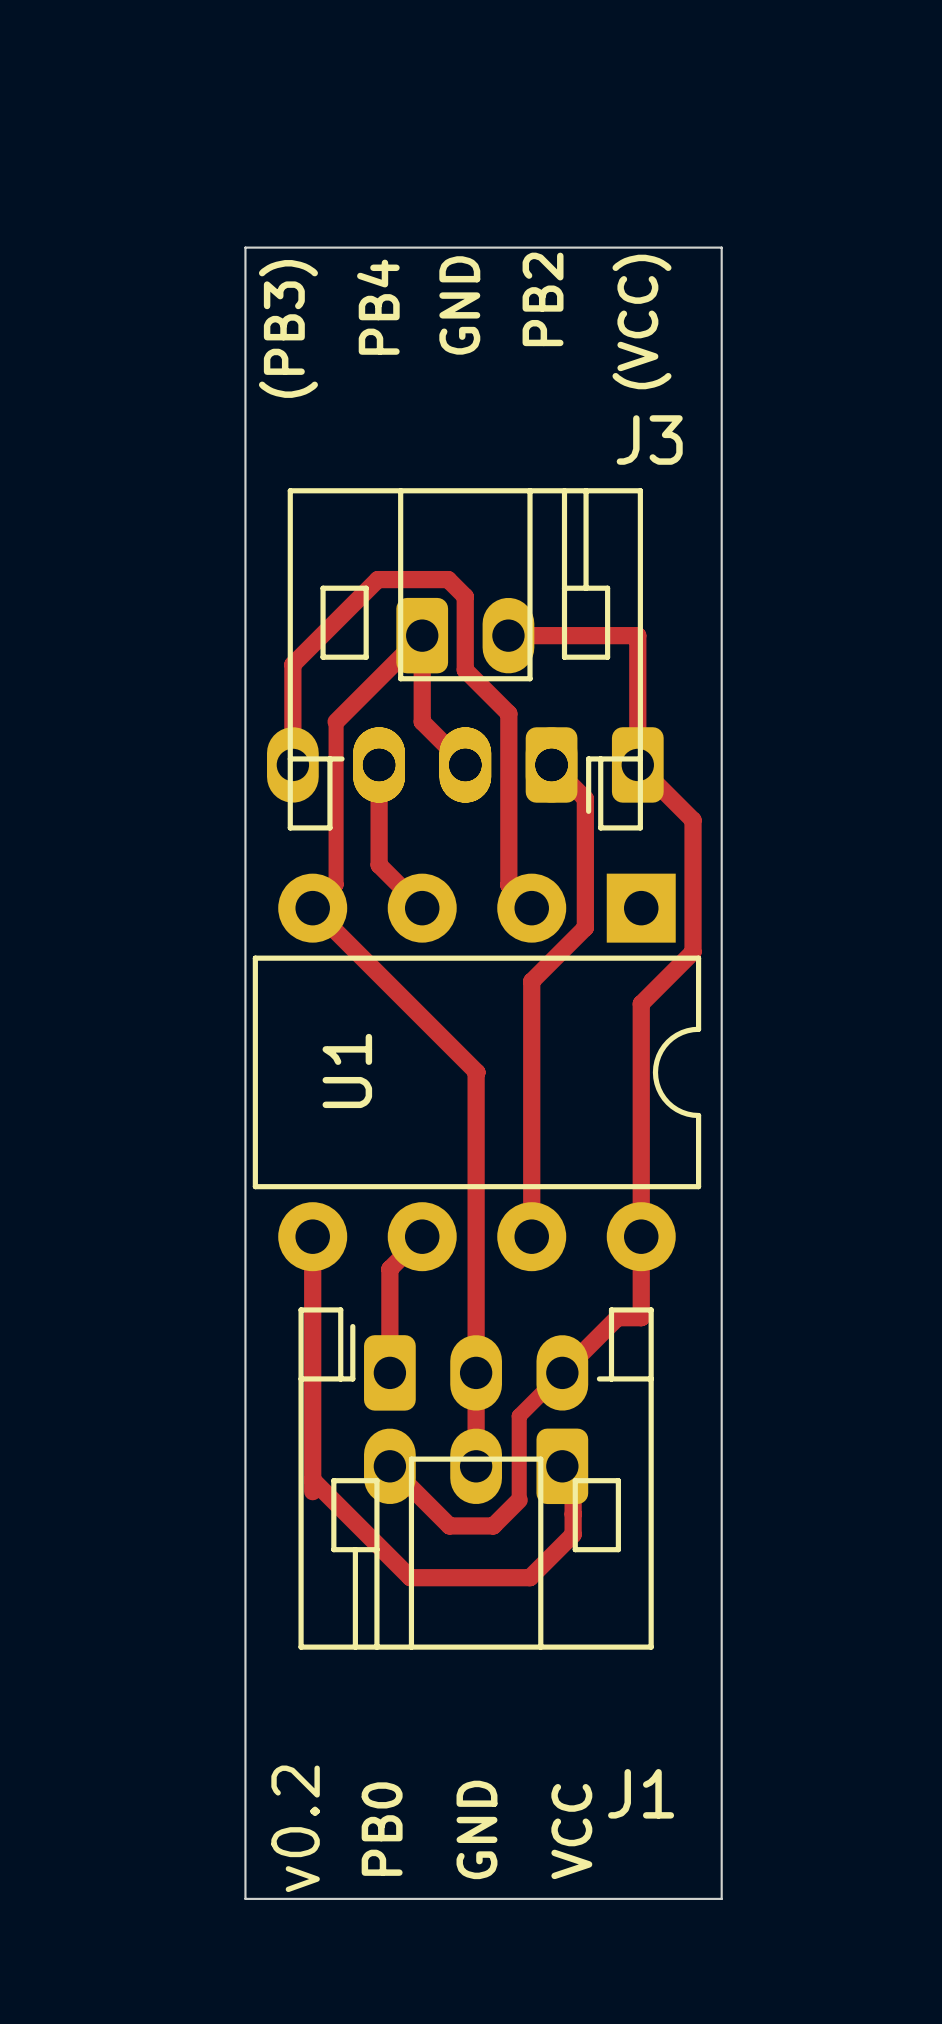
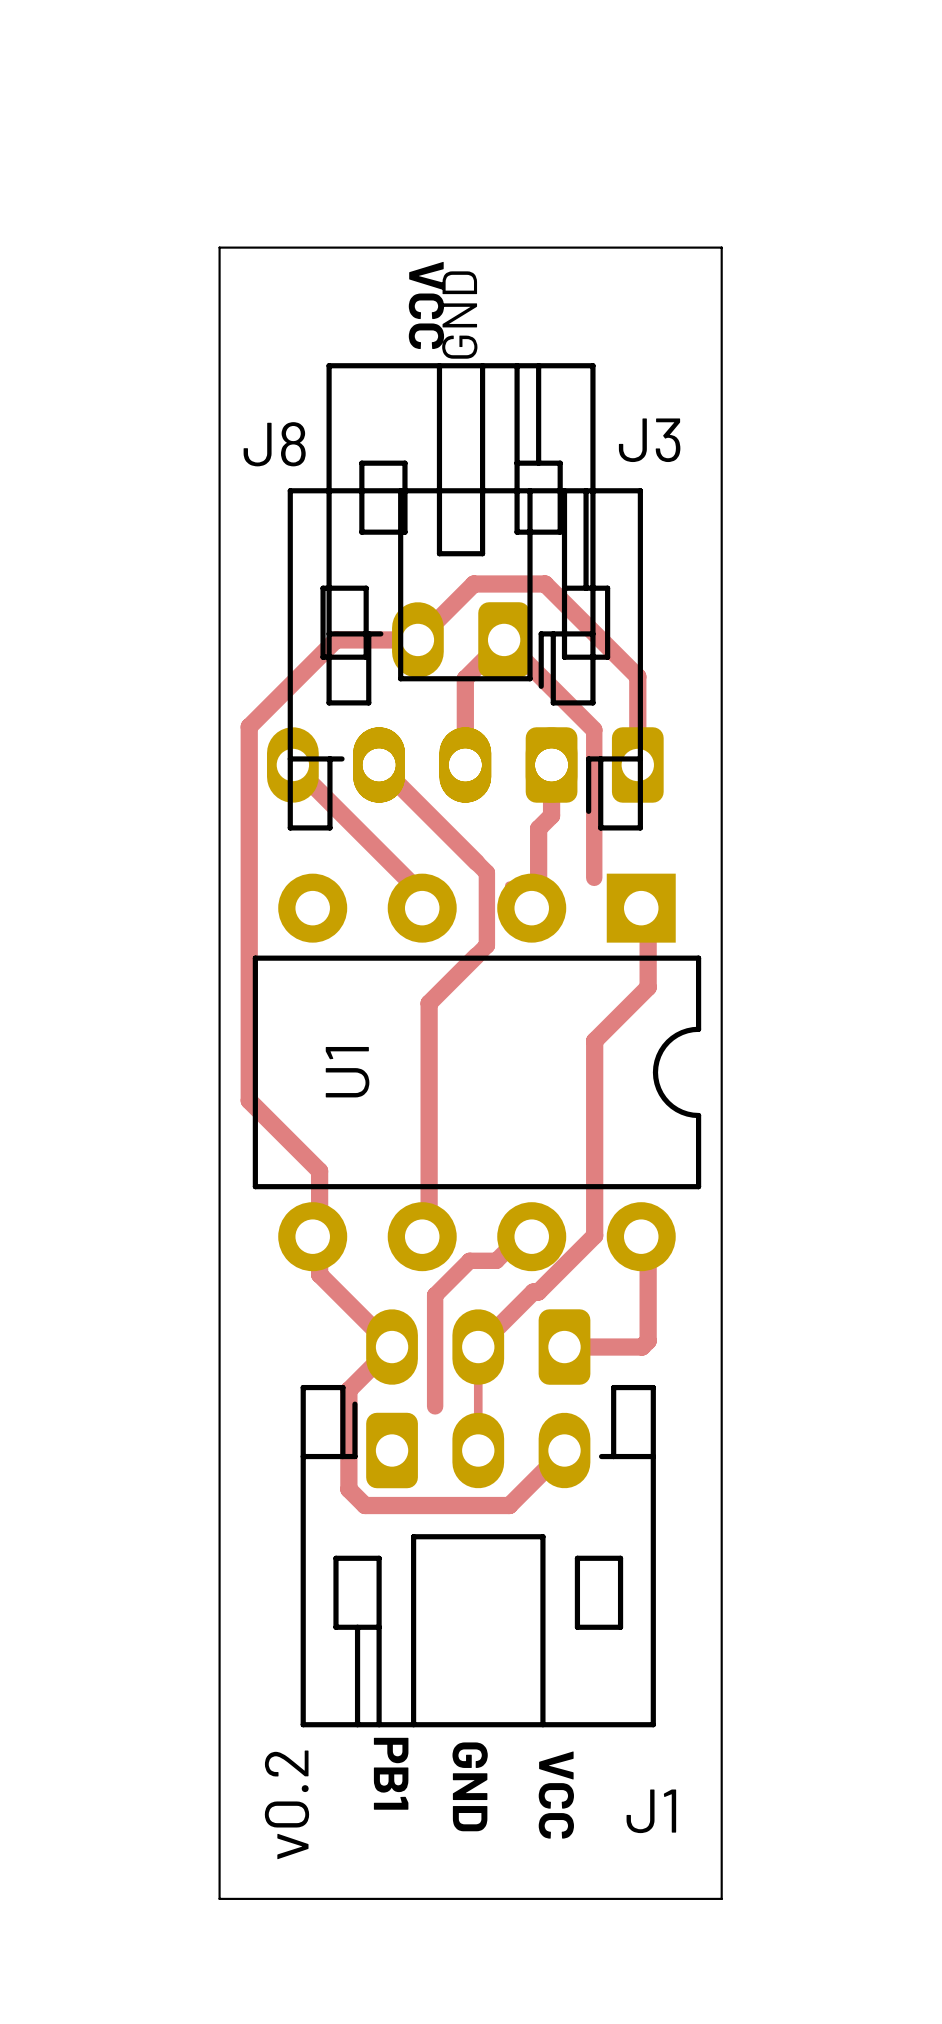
board edge: (245, 247) (245, 1898) -> (245, 247) (219, 247) (219, 1898) (245, 1898)
text: PB2 (543, 299) -> none
text: PB4 (378, 307) -> none
text: none -> VCC (426, 305)
text: (VCC) (641, 321) -> none
text: (PB3) (288, 328) -> none
top track: (422, 635) (422, 721) (465, 764) -> (593, 729) (504, 639) (465, 678) (465, 764)
J8 side: bottom (465, 635) -> top (461, 534)
top track: (508, 635) (637, 635) (637, 676) -> (422, 635) (473, 583) (545, 583) (637, 676)
top track: (417, 639) (336, 721) (336, 884) (312, 908) -> (417, 639) (336, 639) (249, 726) (249, 1100) (319, 1171) (319, 1274) (392, 1347) (348, 1390) (348, 1489) (365, 1505) (509, 1505) (564, 1450)
top track: none -> (594, 730) (594, 877)
top track: (292, 764) (292, 664) (377, 579) (448, 579) (465, 596) (465, 670) (508, 713) (508, 885) (531, 908) -> (292, 764) (417, 890) (429, 890)
top track: (379, 764) (379, 865) (422, 908) -> none
top track: none -> (387, 764) (379, 764) (486, 872) (486, 945) (429, 1003) (429, 1218)
top track: (551, 764) (585, 798) (585, 927) (531, 981) (531, 1236) -> (551, 764) (551, 815) (538, 828) (538, 890) (531, 896) (520, 896)
top track: (637, 764) (693, 820) (693, 952) (641, 1003) (641, 1317) (617, 1317) (519, 1416) (519, 1500) (493, 1525) (449, 1525) (389, 1466) -> none
top track: none -> (637, 904) (637, 900) (648, 890) (648, 987) (594, 1040) (594, 1235) (538, 1292) (533, 1292) (478, 1347) (478, 1450)
top track: (312, 908) (476, 1072) (476, 1466) -> none
top track: none -> (538, 1218) (496, 1260) (469, 1260) (435, 1295) (435, 1406)
top track: none -> (648, 1218) (648, 1340) (642, 1347) (564, 1347)
top track: (312, 1236) (312, 1491) -> none
top track: (422, 1236) (389, 1269) (389, 1372) -> none
part position: (476, 1466) -> (478, 1347)
J1 position: (476, 1478) -> (478, 1556)
top track: (312, 1480) (410, 1577) (530, 1577) (573, 1534) (573, 1491) -> none
J1 name position: J1 (641, 1793) -> J1 (651, 1811)
text position: v0.2 (295, 1828) -> v0.2 (286, 1804)
text: PB0 (382, 1829) -> PB1 (391, 1773)
text rotation: 0° (476, 1829) -> 180° (470, 1786)
text rotation: 0° (571, 1831) -> 180° (556, 1795)

